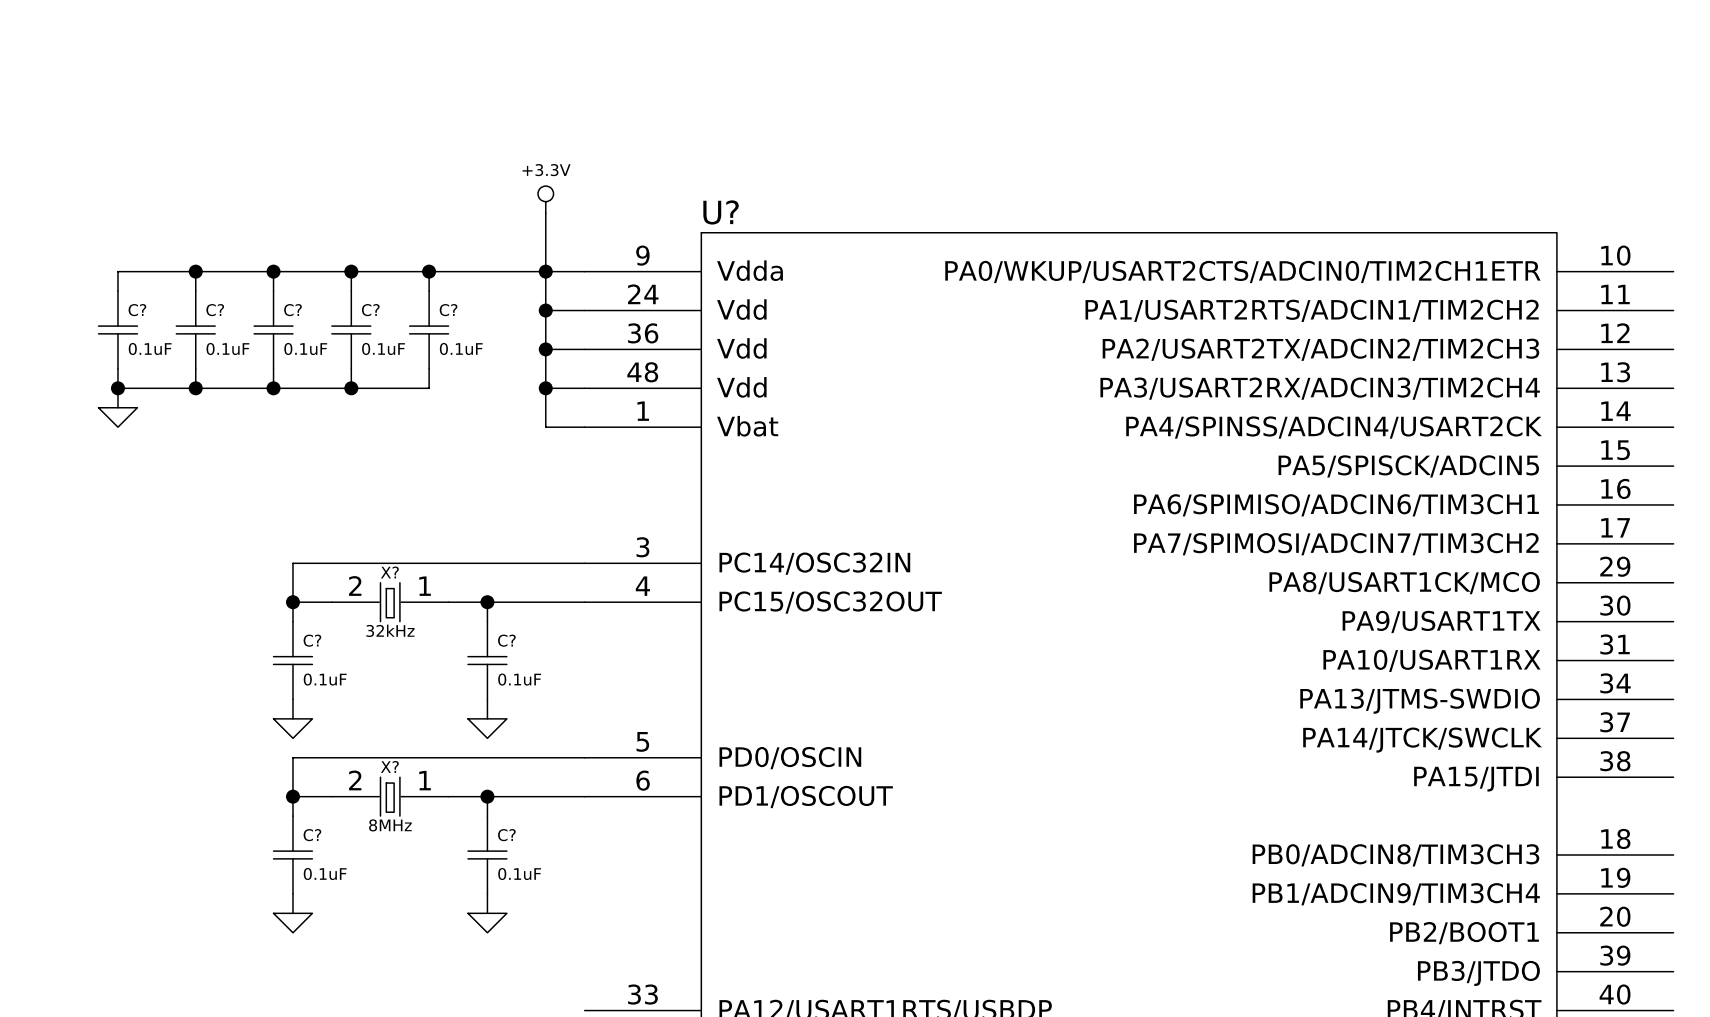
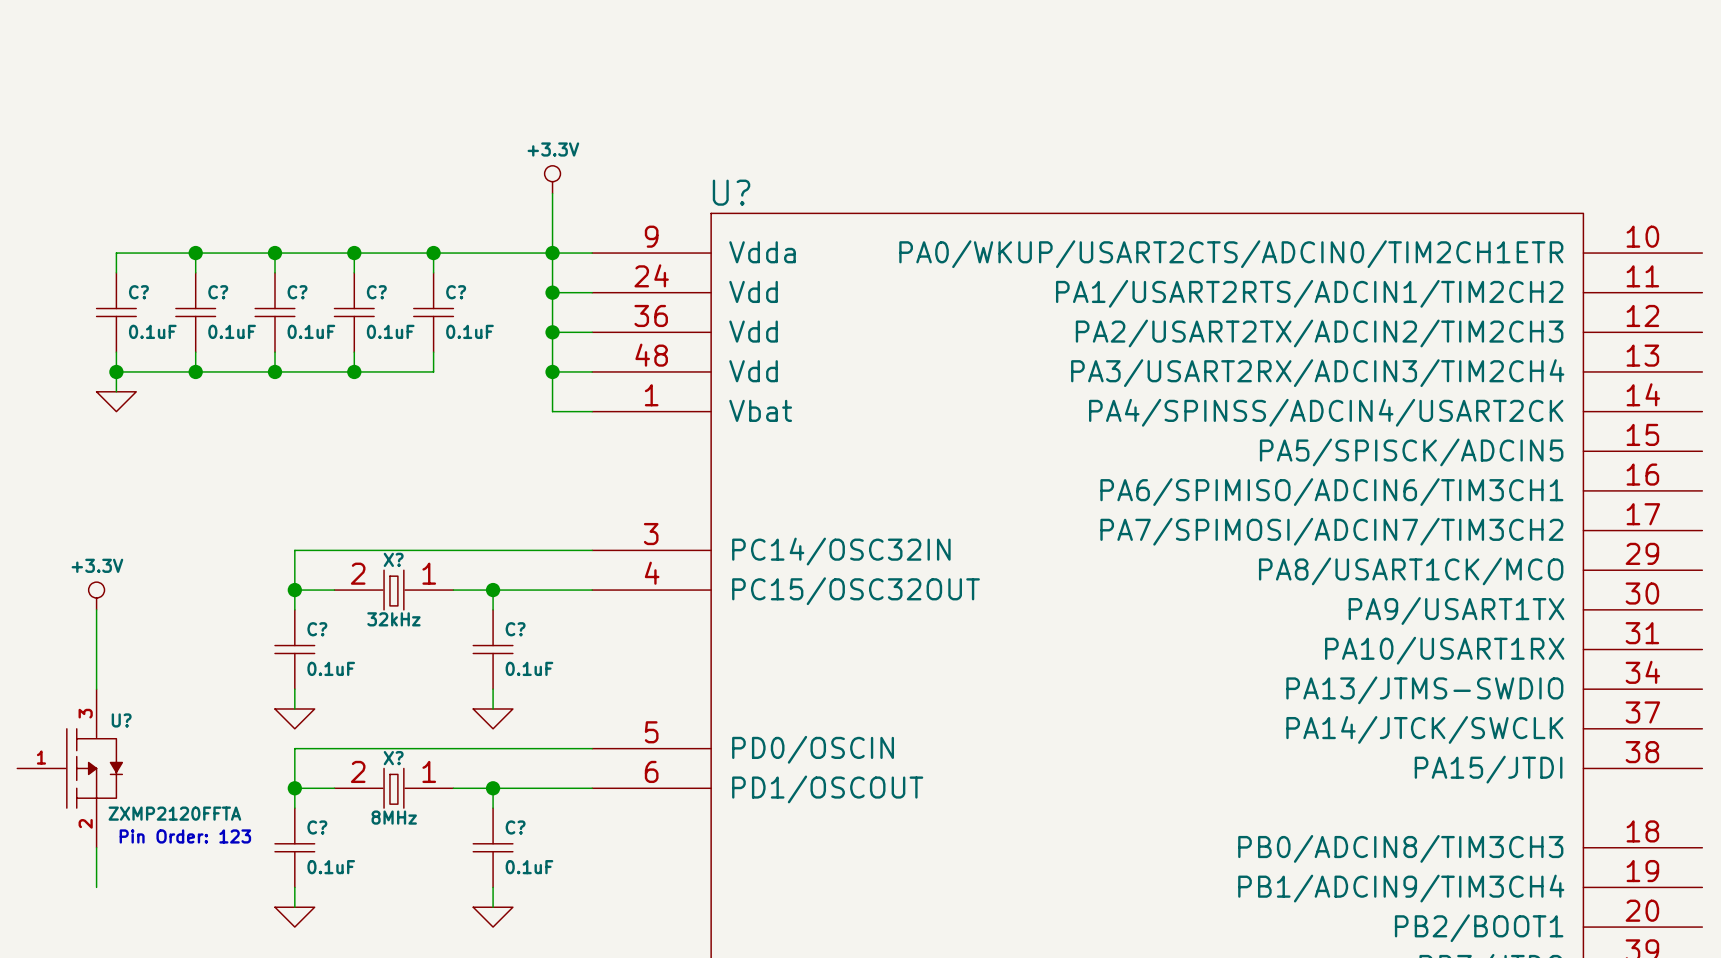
power symbol: none -> +3.3V (96, 595)
wire: none -> (96, 609) (96, 689)
U?: none -> ZXMP2120FFTA (69, 768)
text: none -> Pin Order: 123 (185, 836)
wire: none -> (96, 847) (96, 887)

